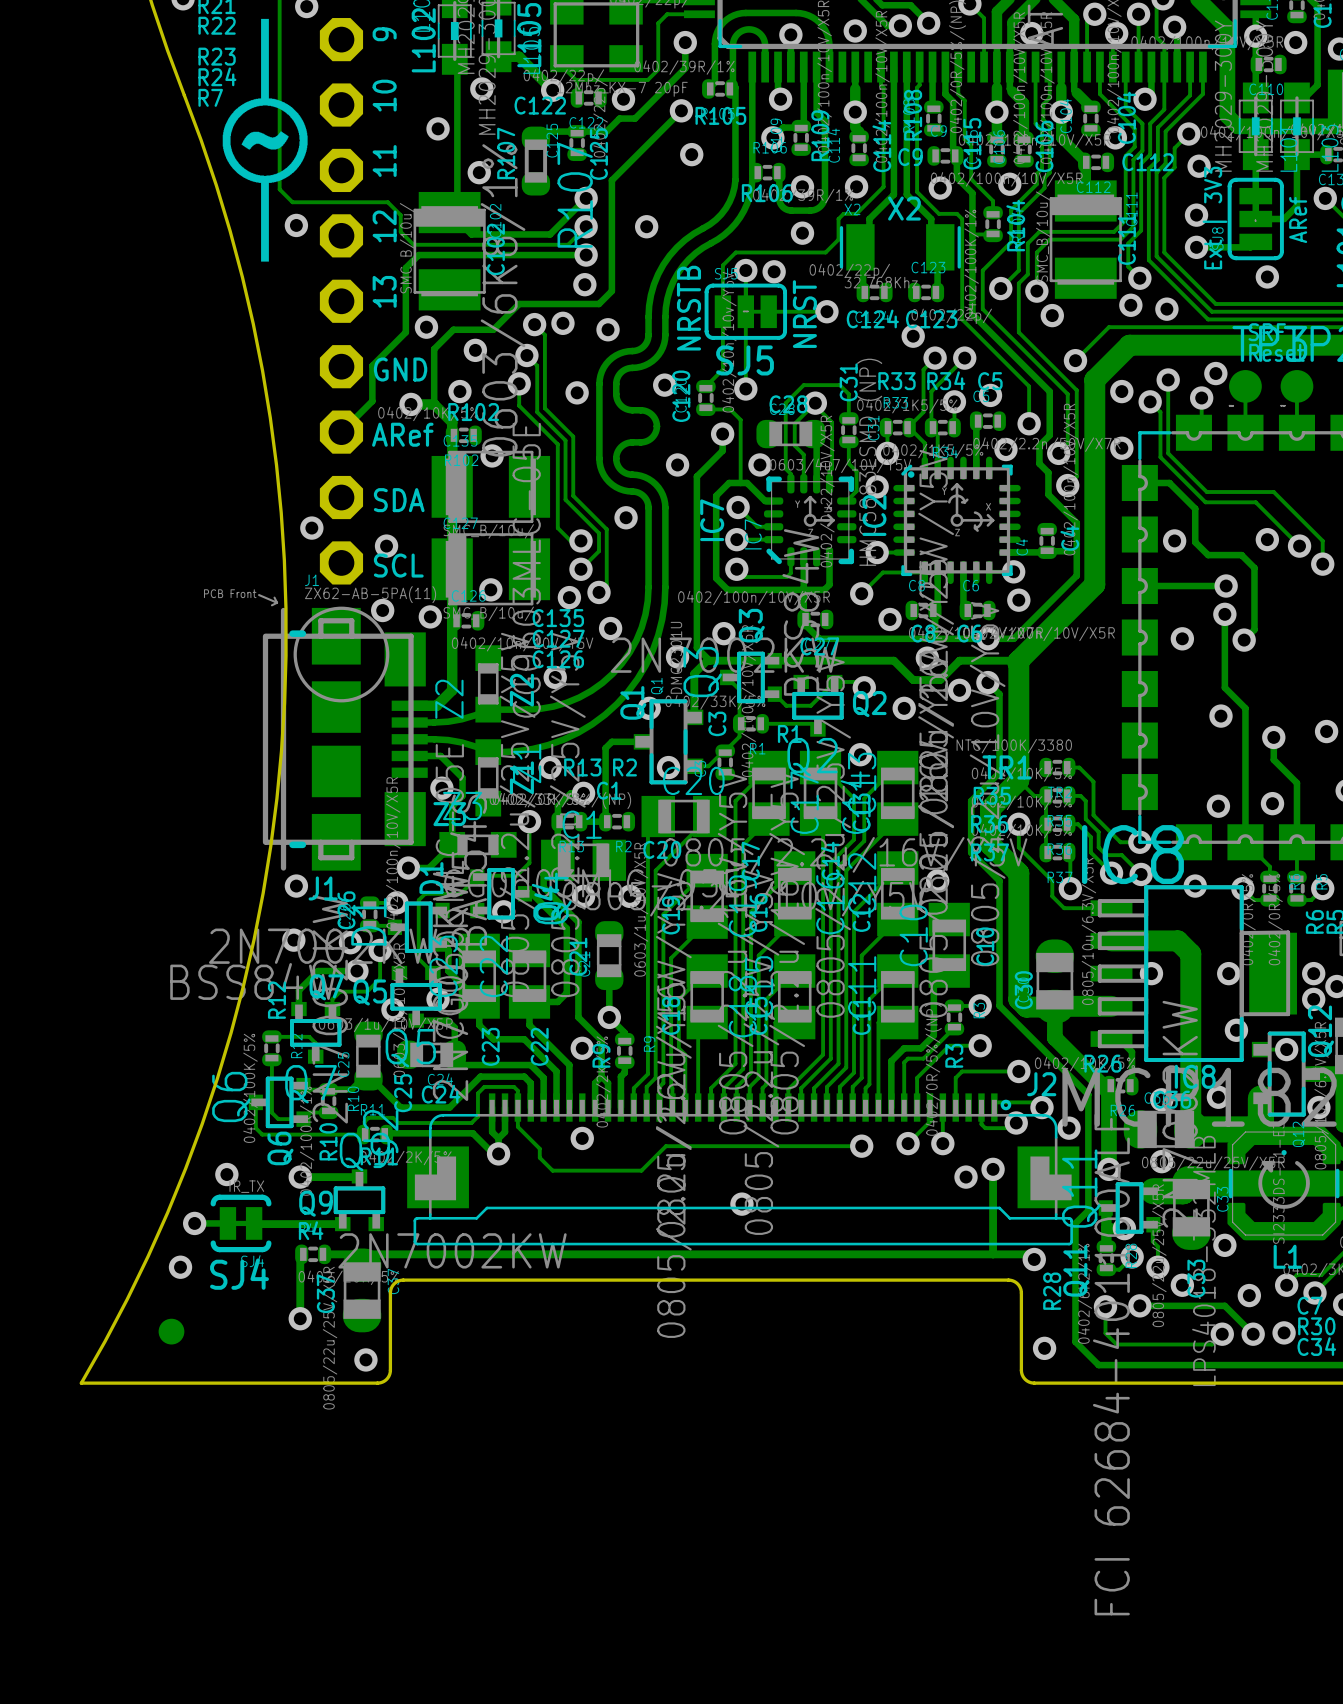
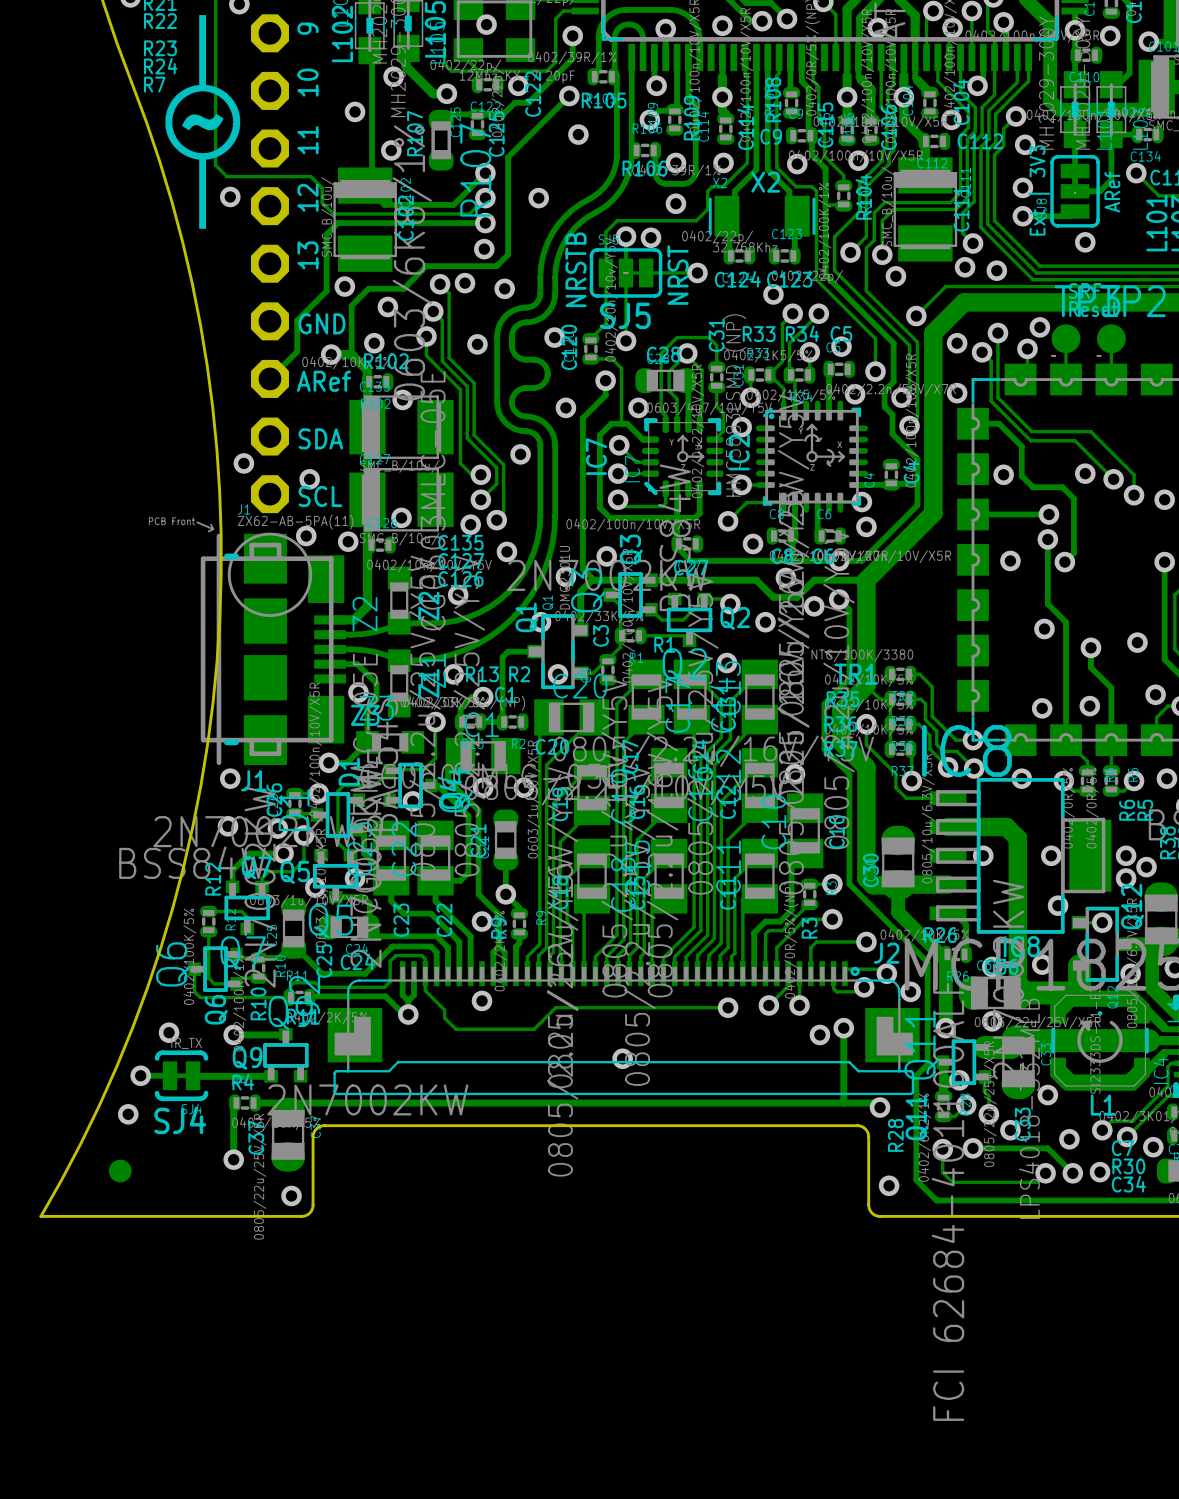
track: (674, 14) (667, 14) (658, 23) (658, 69) (647, 79) (575, 79) -> (563, 11) (555, 18) (555, 62) (546, 71) (451, 71) (444, 64) (444, 49)
via: none -> (486, 24)
track: (498, 56) (519, 56) (552, 90) -> none
track: none -> (406, 50) (406, 66) (433, 93) (446, 93)
via position: (552, 90) -> (446, 93)
text rotation: 0° (540, 105) -> 90° counterclockwise (533, 94)
text position: C122 (540, 105) -> C122 (533, 94)

